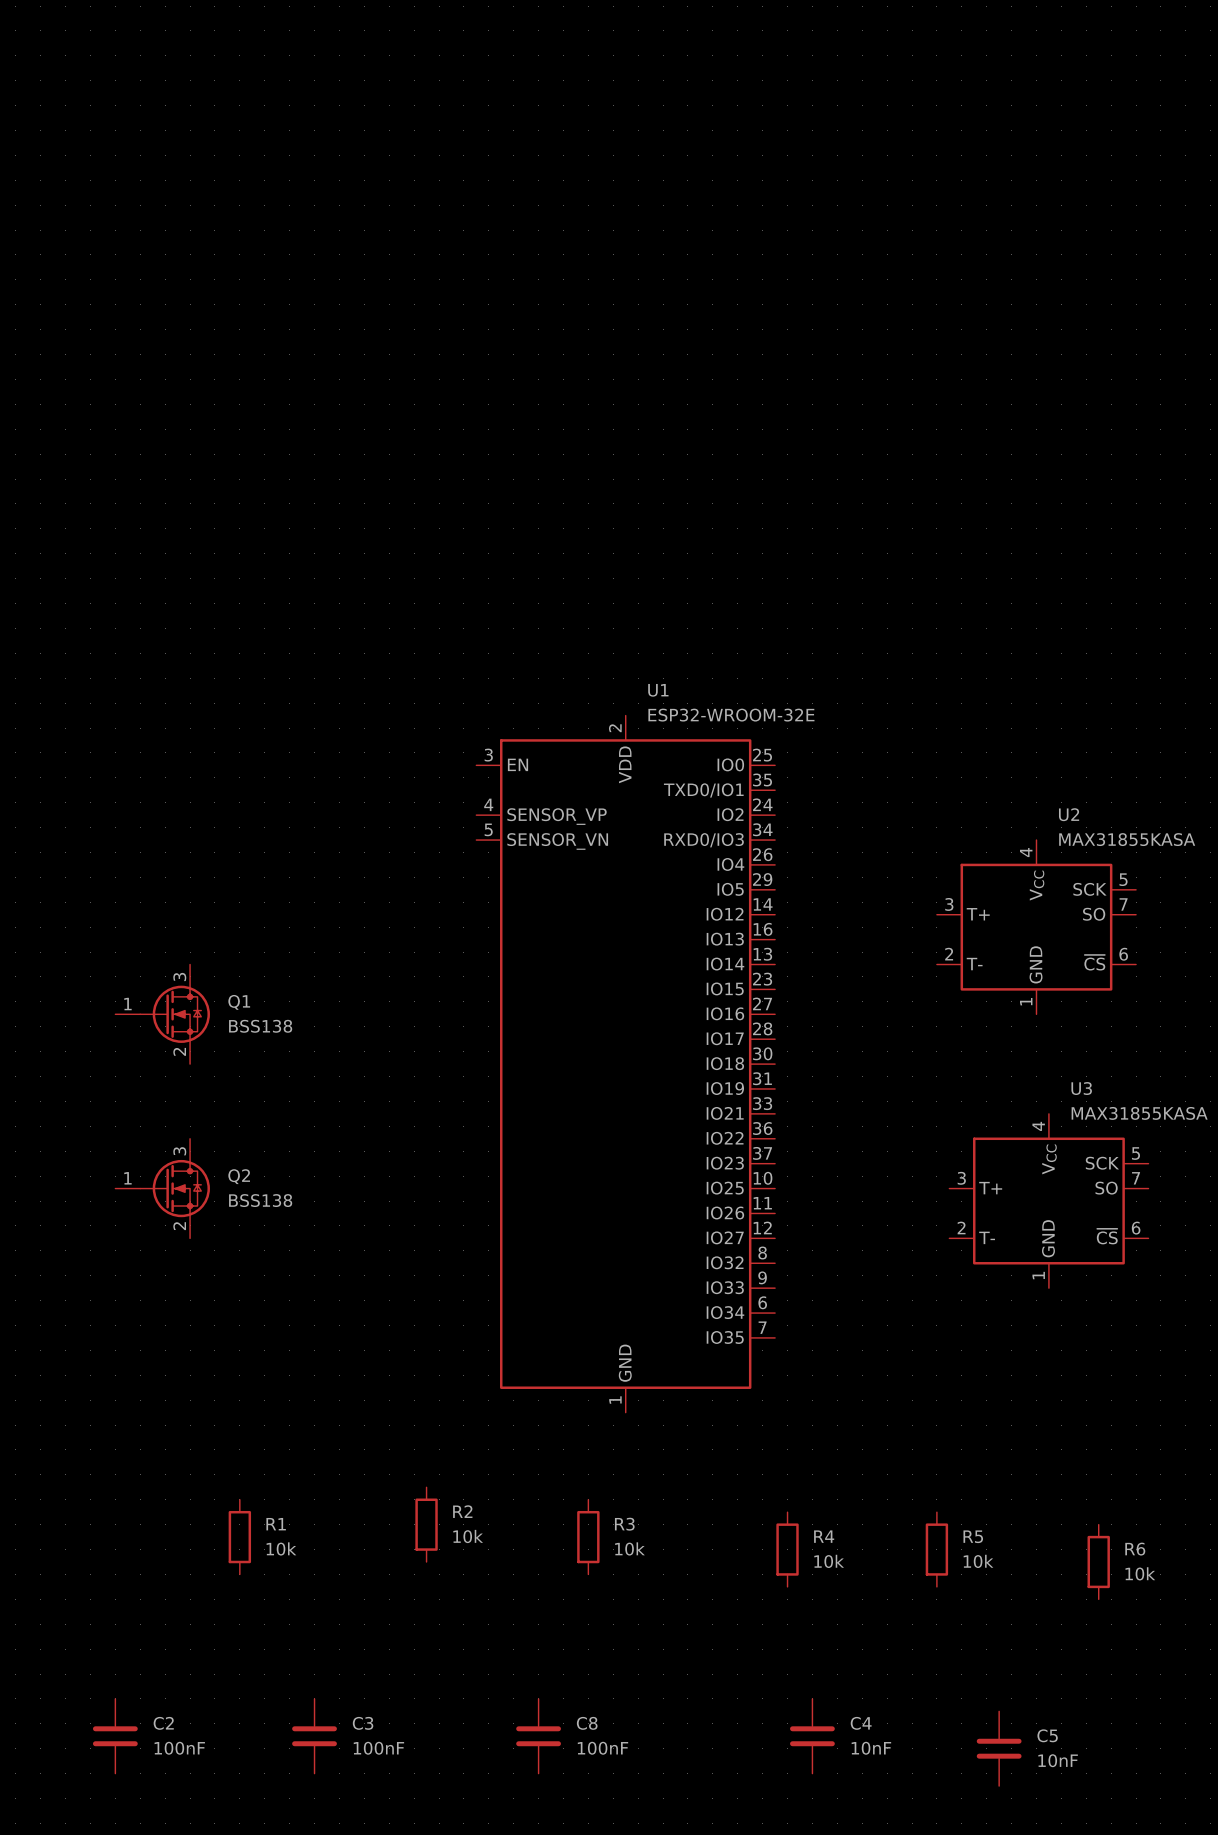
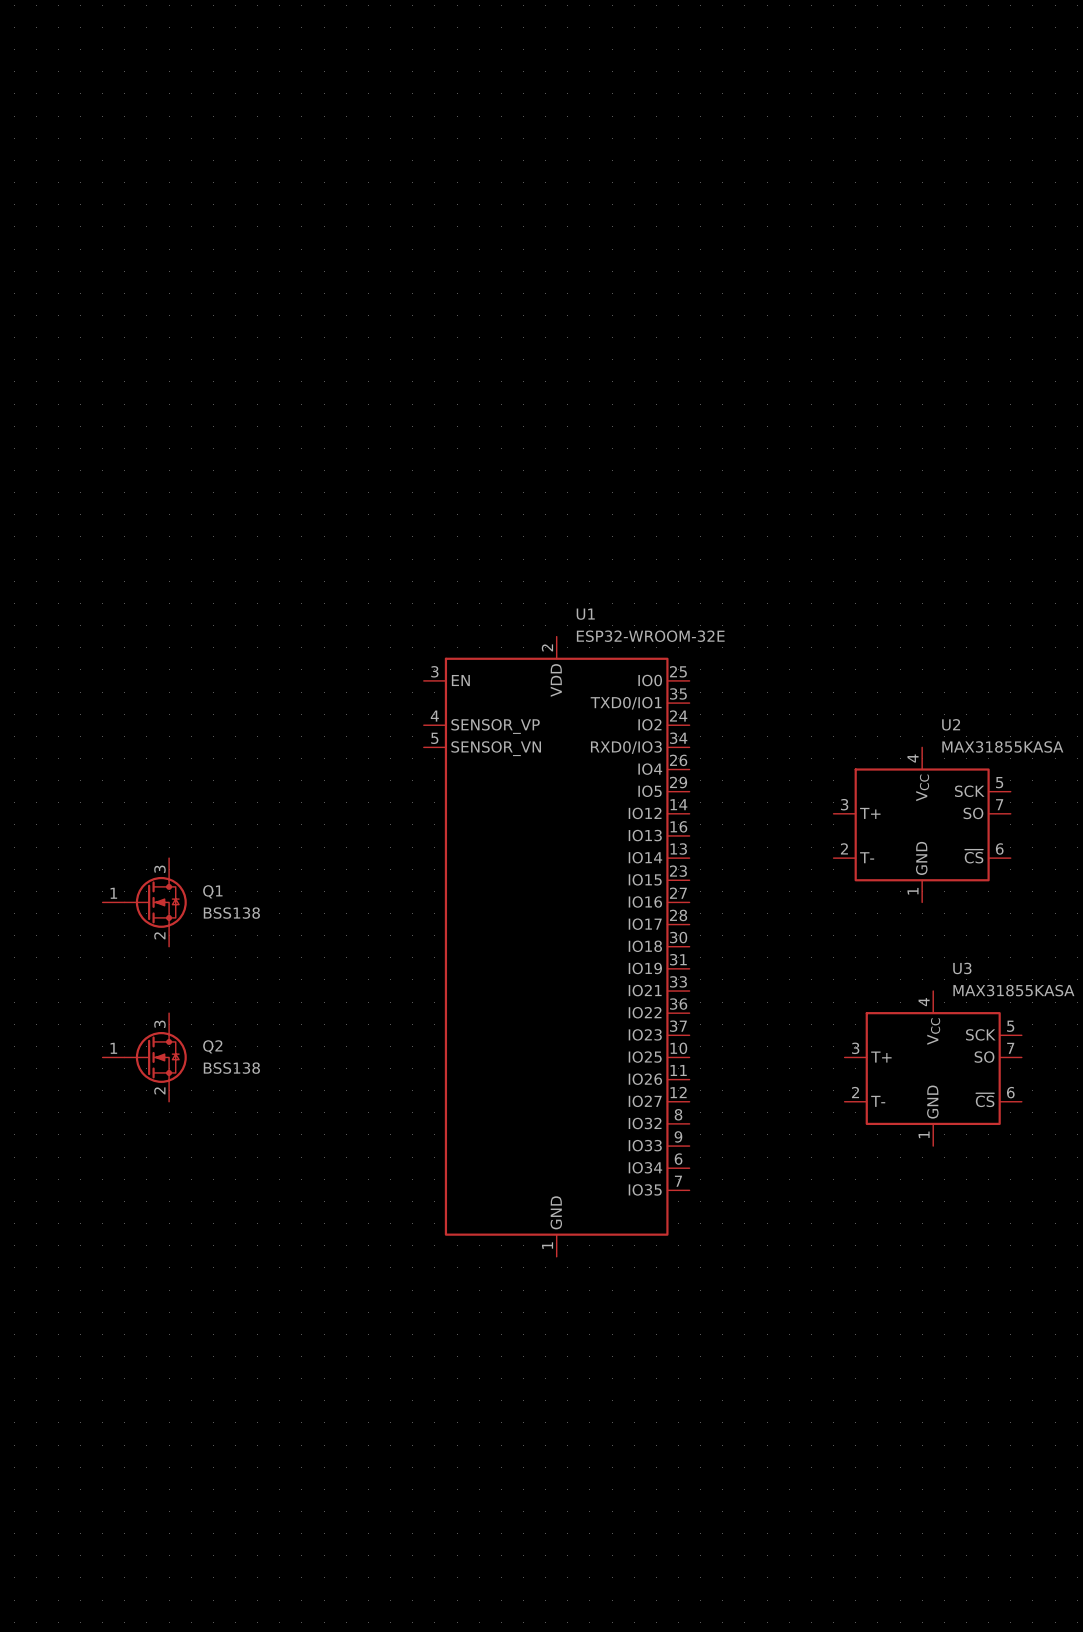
R2: 10k (426, 1524) -> none
R1: 10k (239, 1537) -> none
R3: 10k (588, 1537) -> none
R4: 10k (787, 1549) -> none
R5: 10k (936, 1549) -> none
R6: 10k (1098, 1562) -> none
C2: 100nF (115, 1736) -> none
C3: 100nF (314, 1736) -> none
C8: 100nF (538, 1736) -> none
C4: 10nF (812, 1736) -> none
C5: 10nF (999, 1748) -> none

